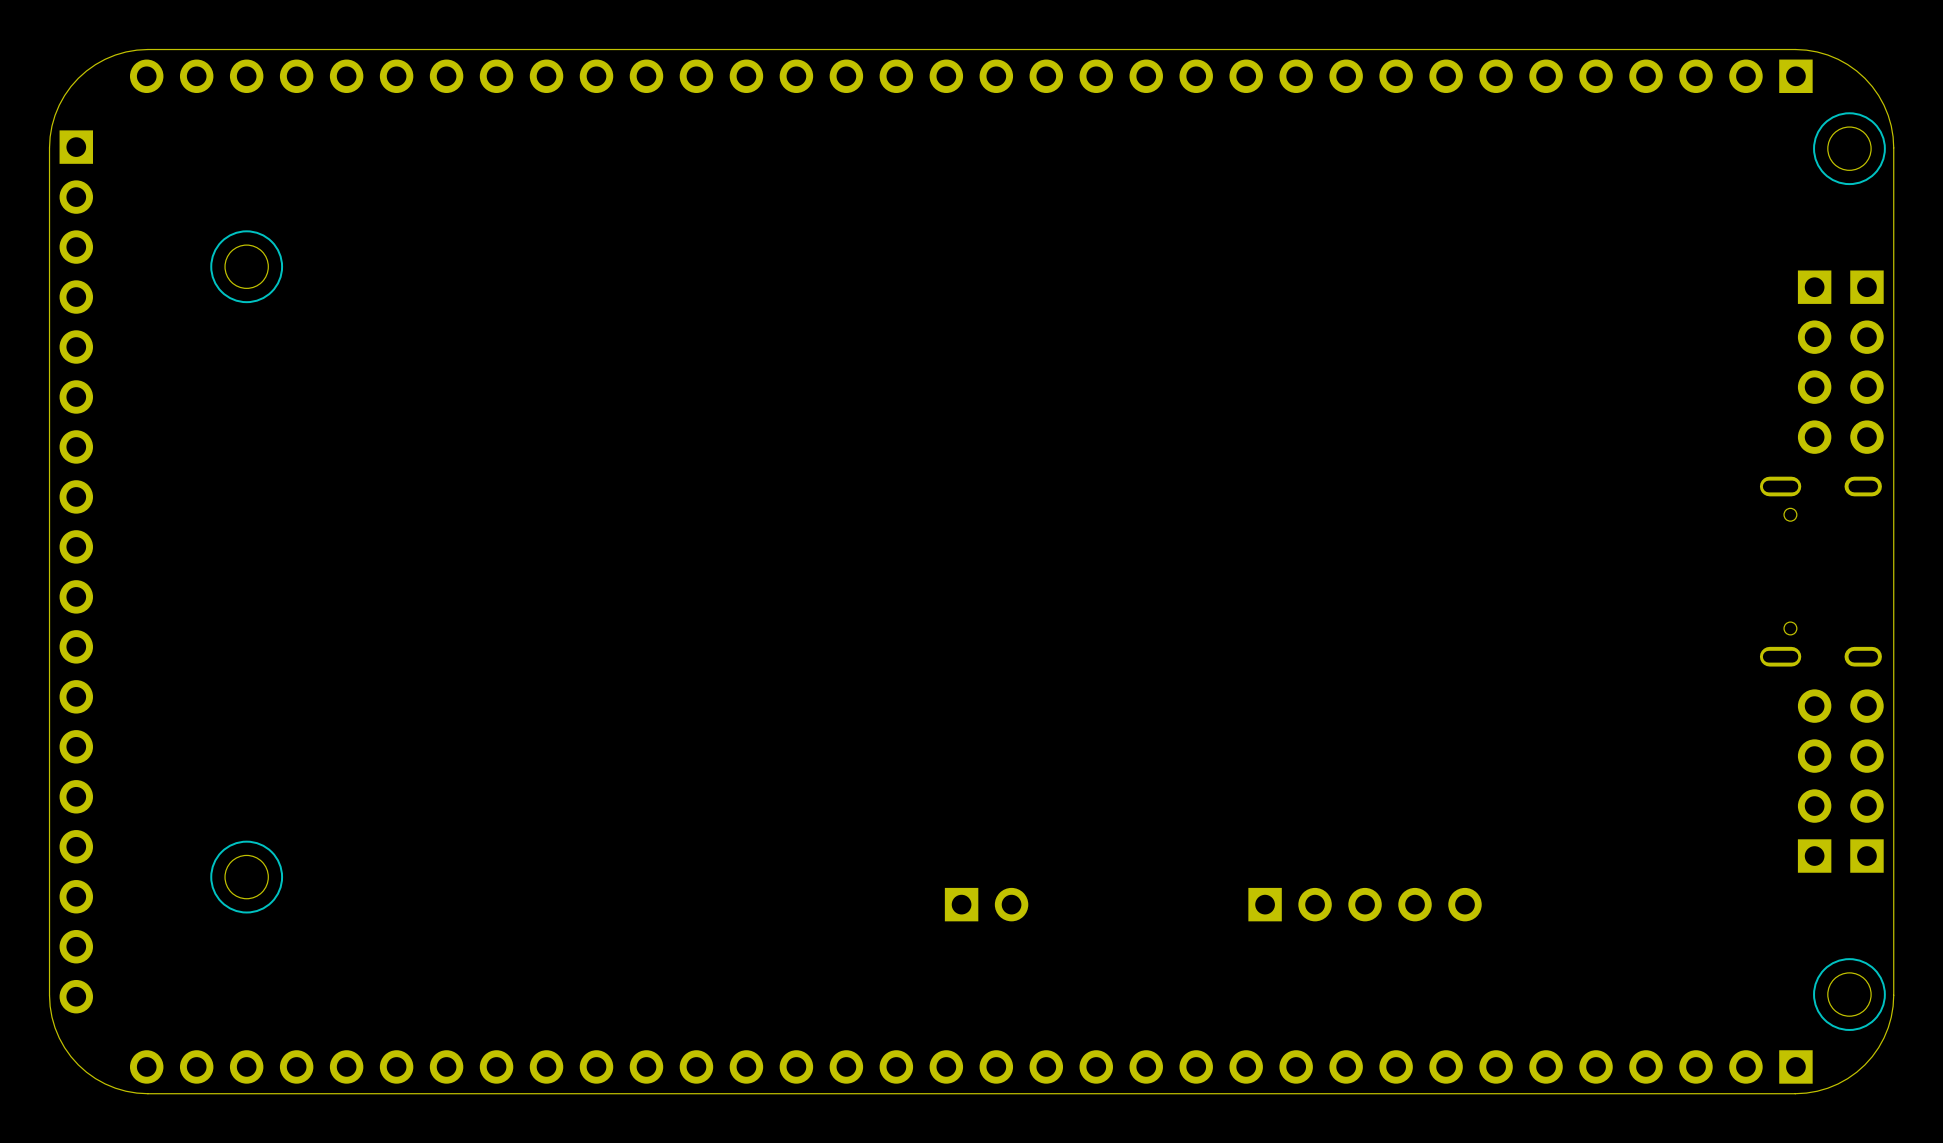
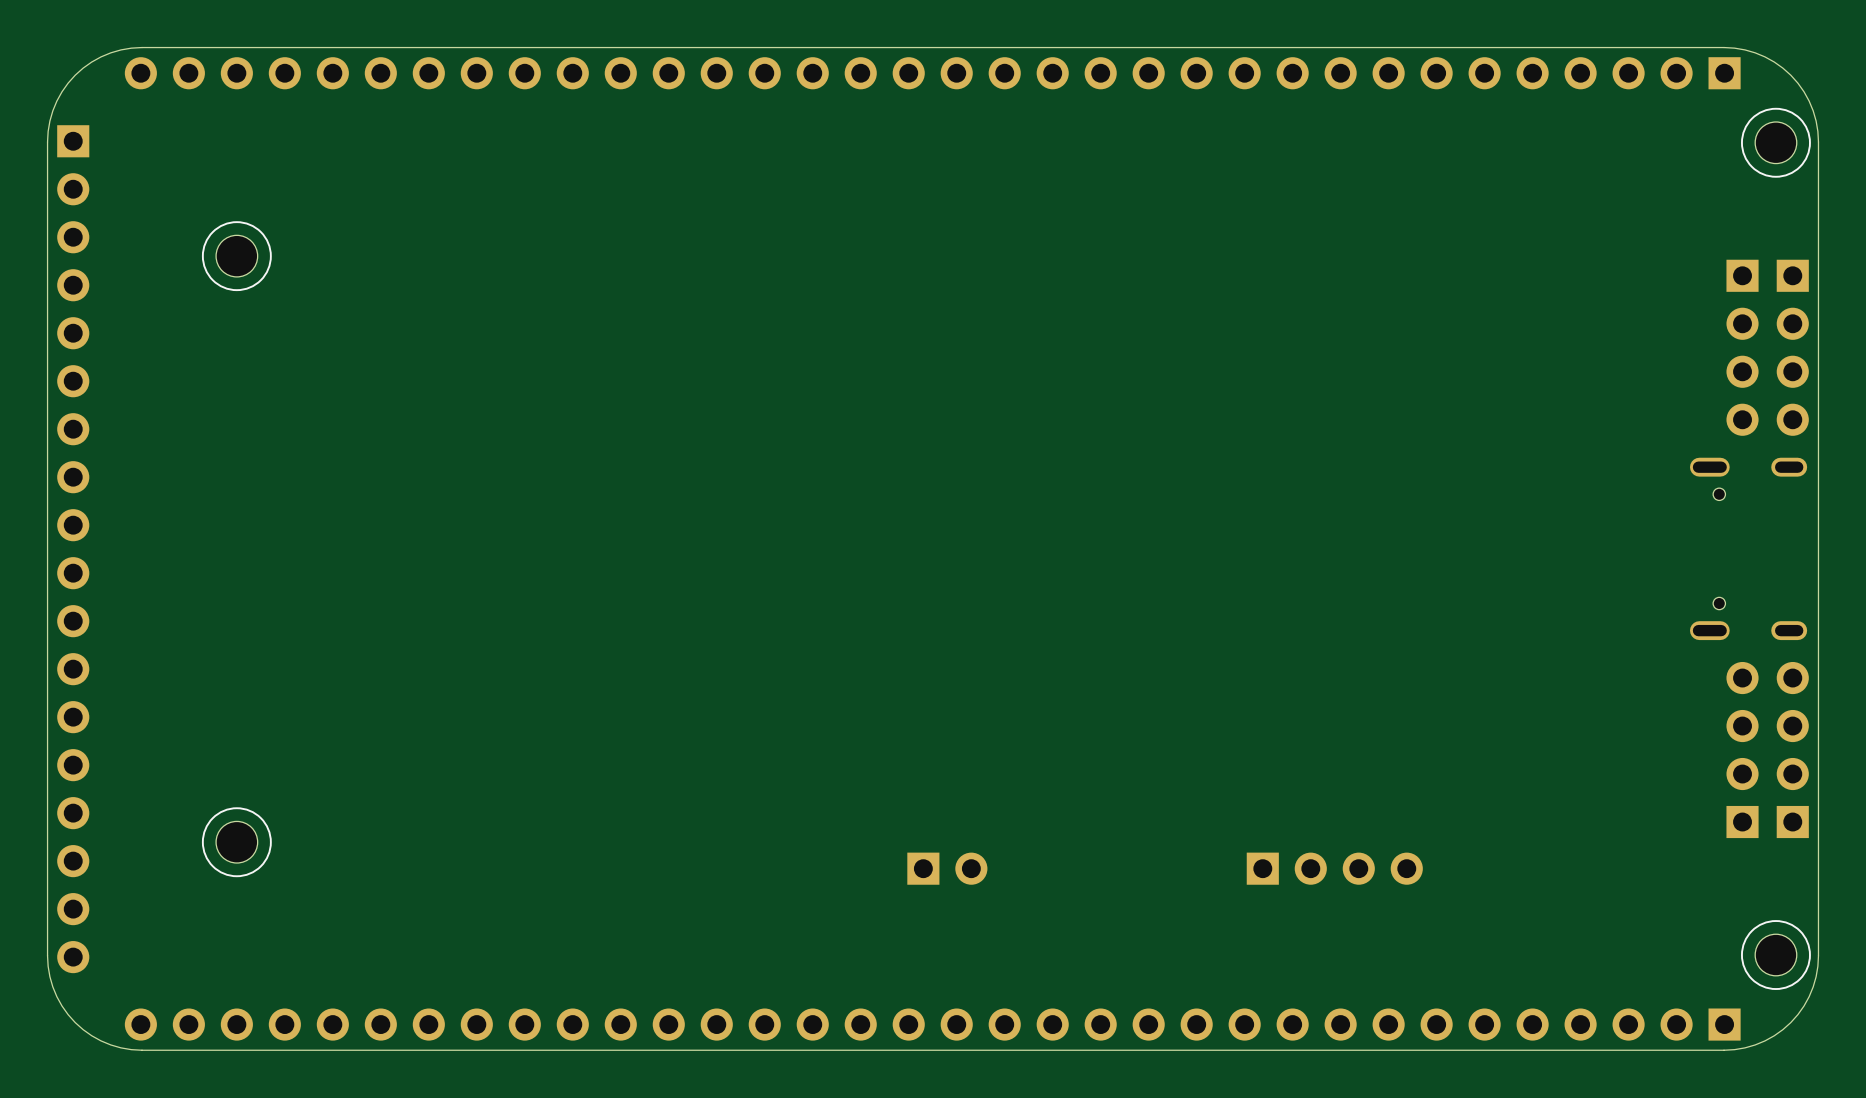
part: (1365, 904) -> none
part: none -> (1334, 868)

